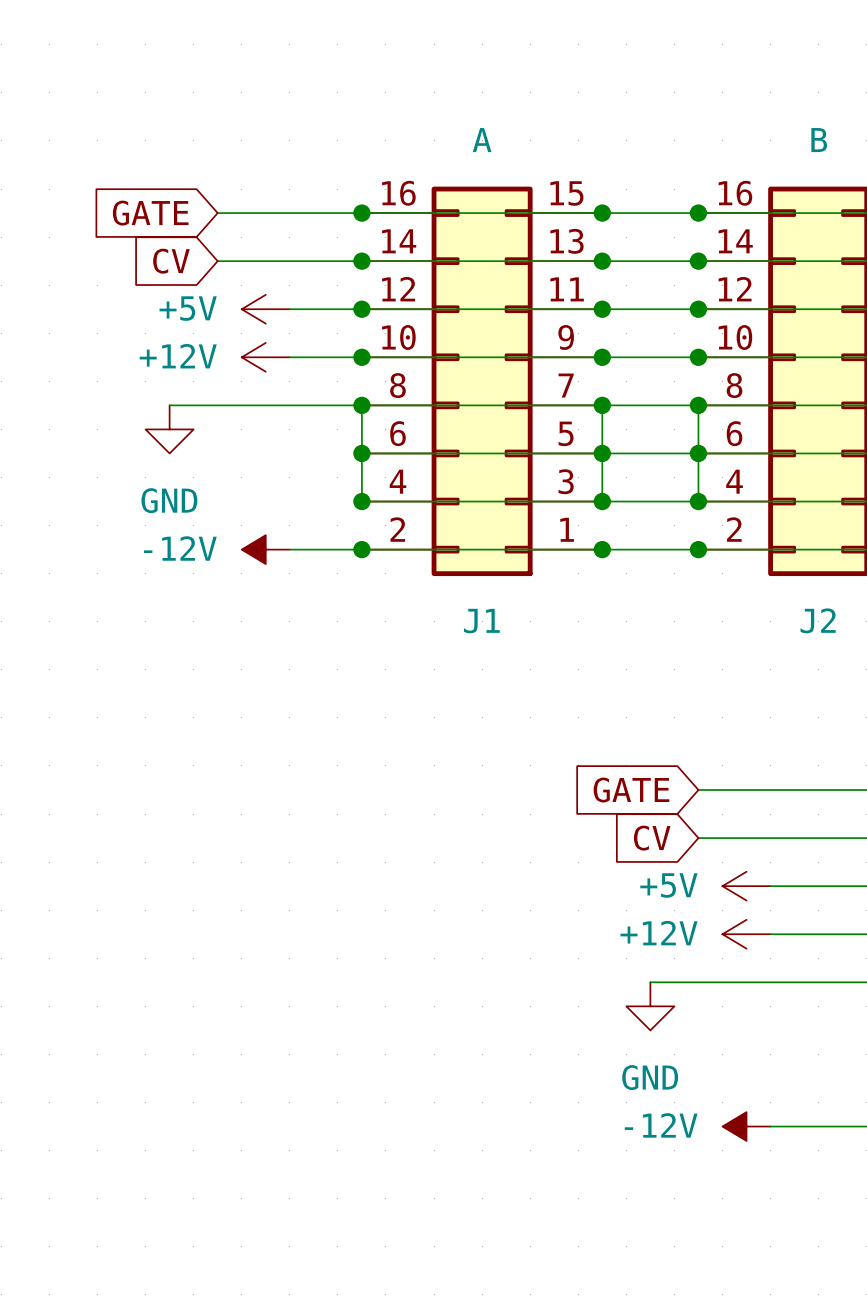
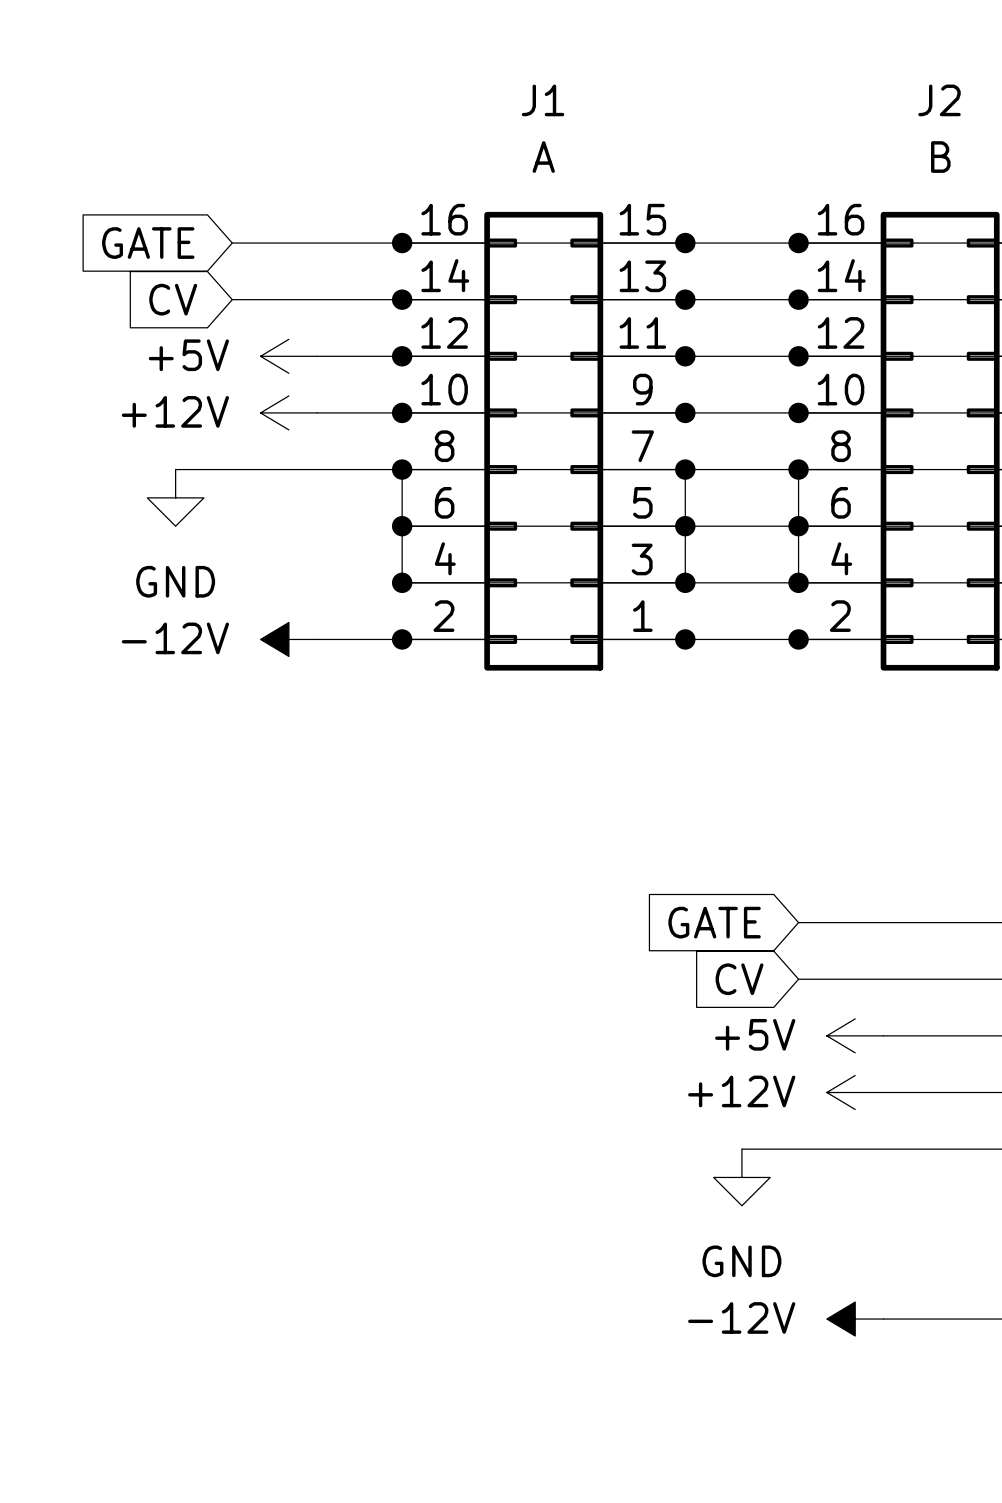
J2 name position: J2 (818, 620) -> J2 (939, 100)
J1 name position: J1 (481, 621) -> J1 (543, 100)

